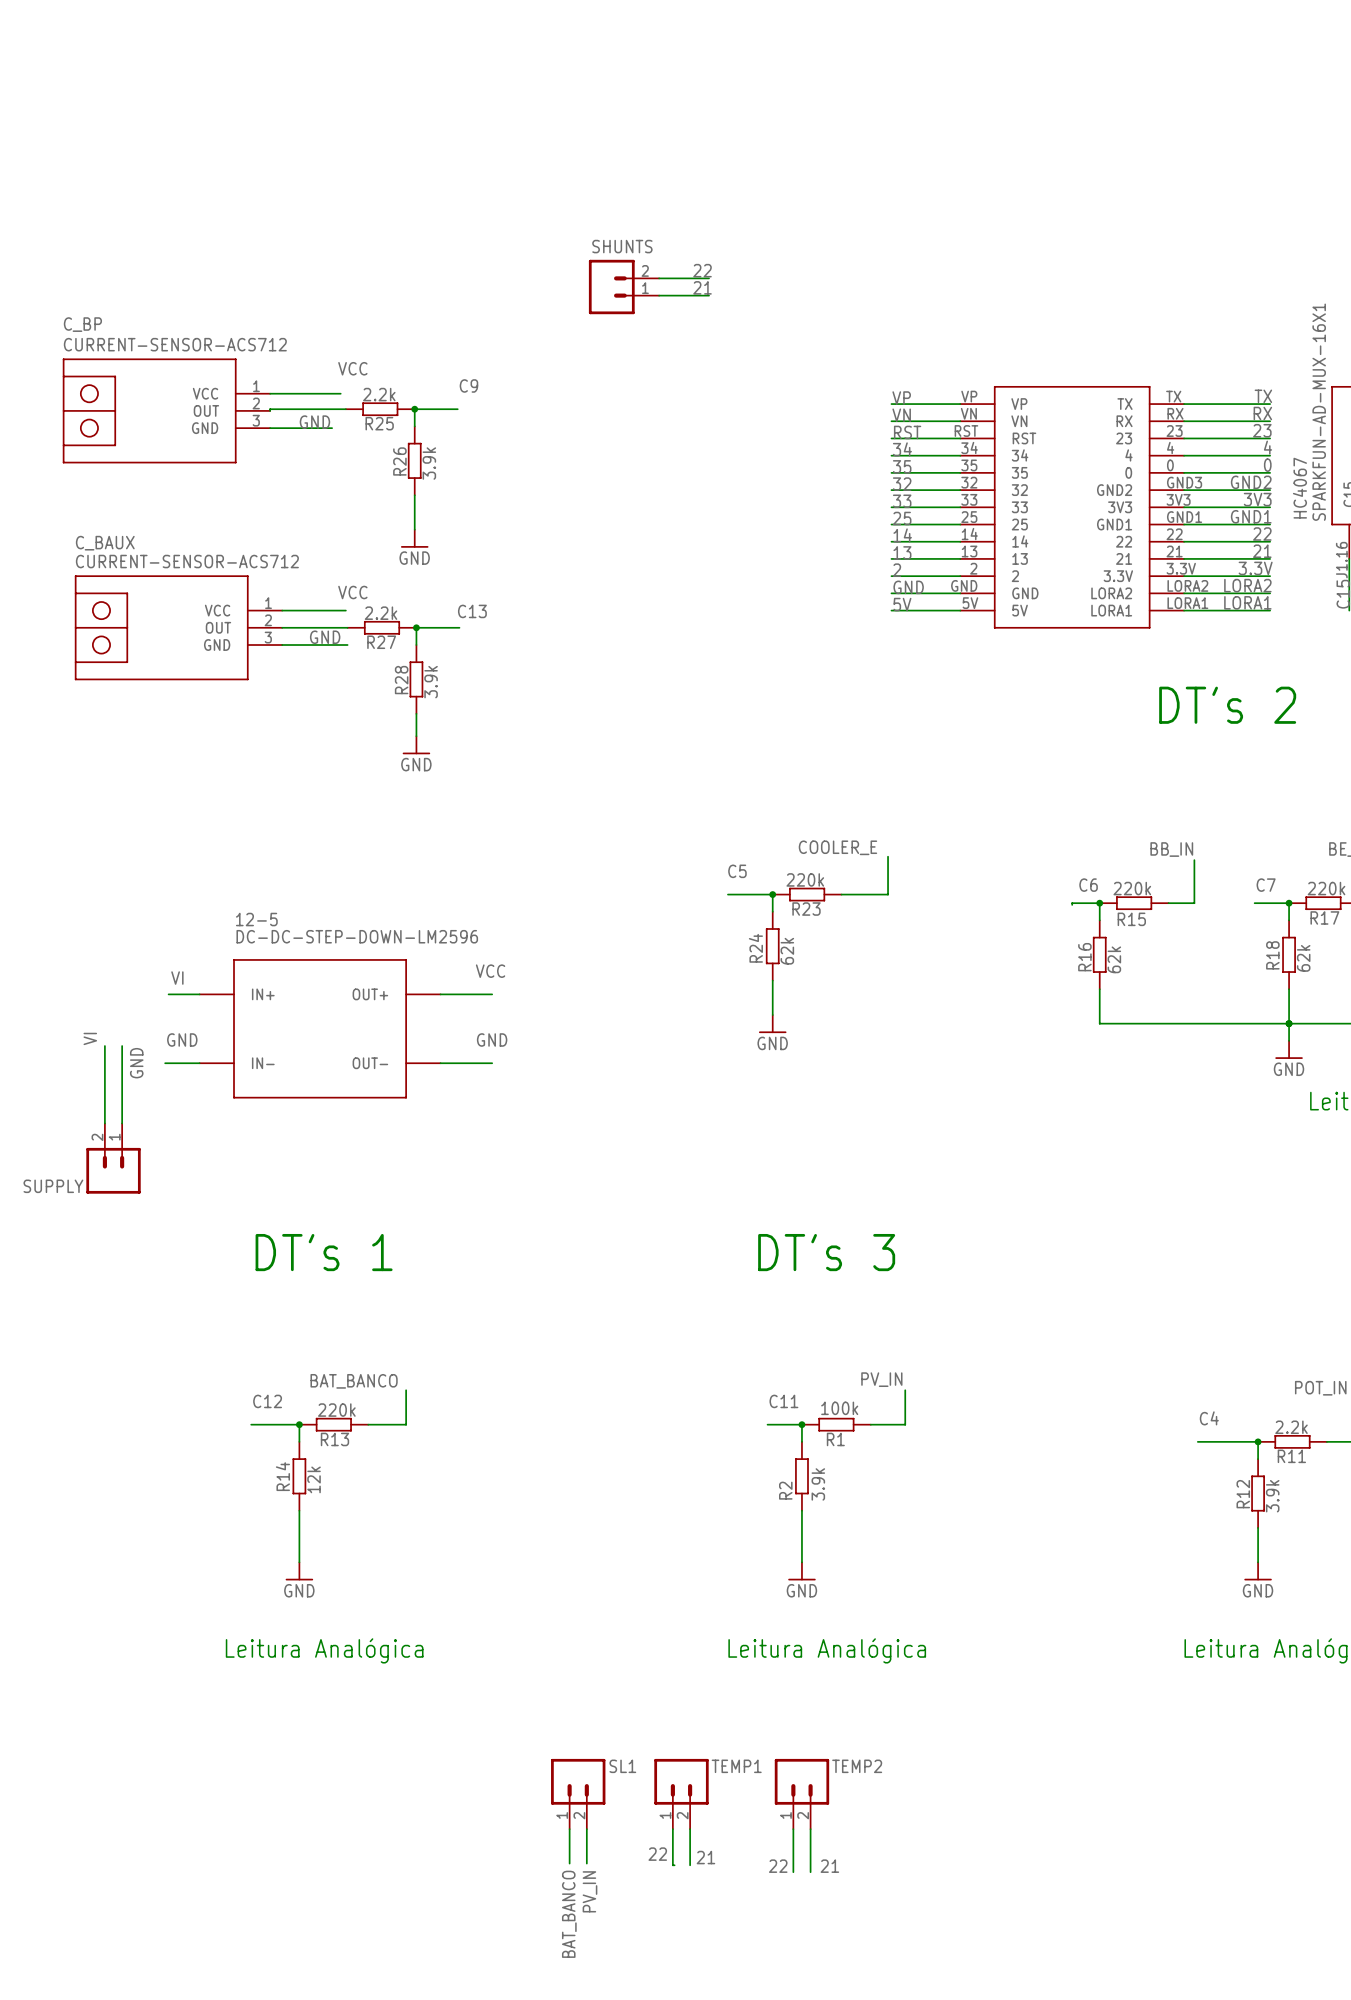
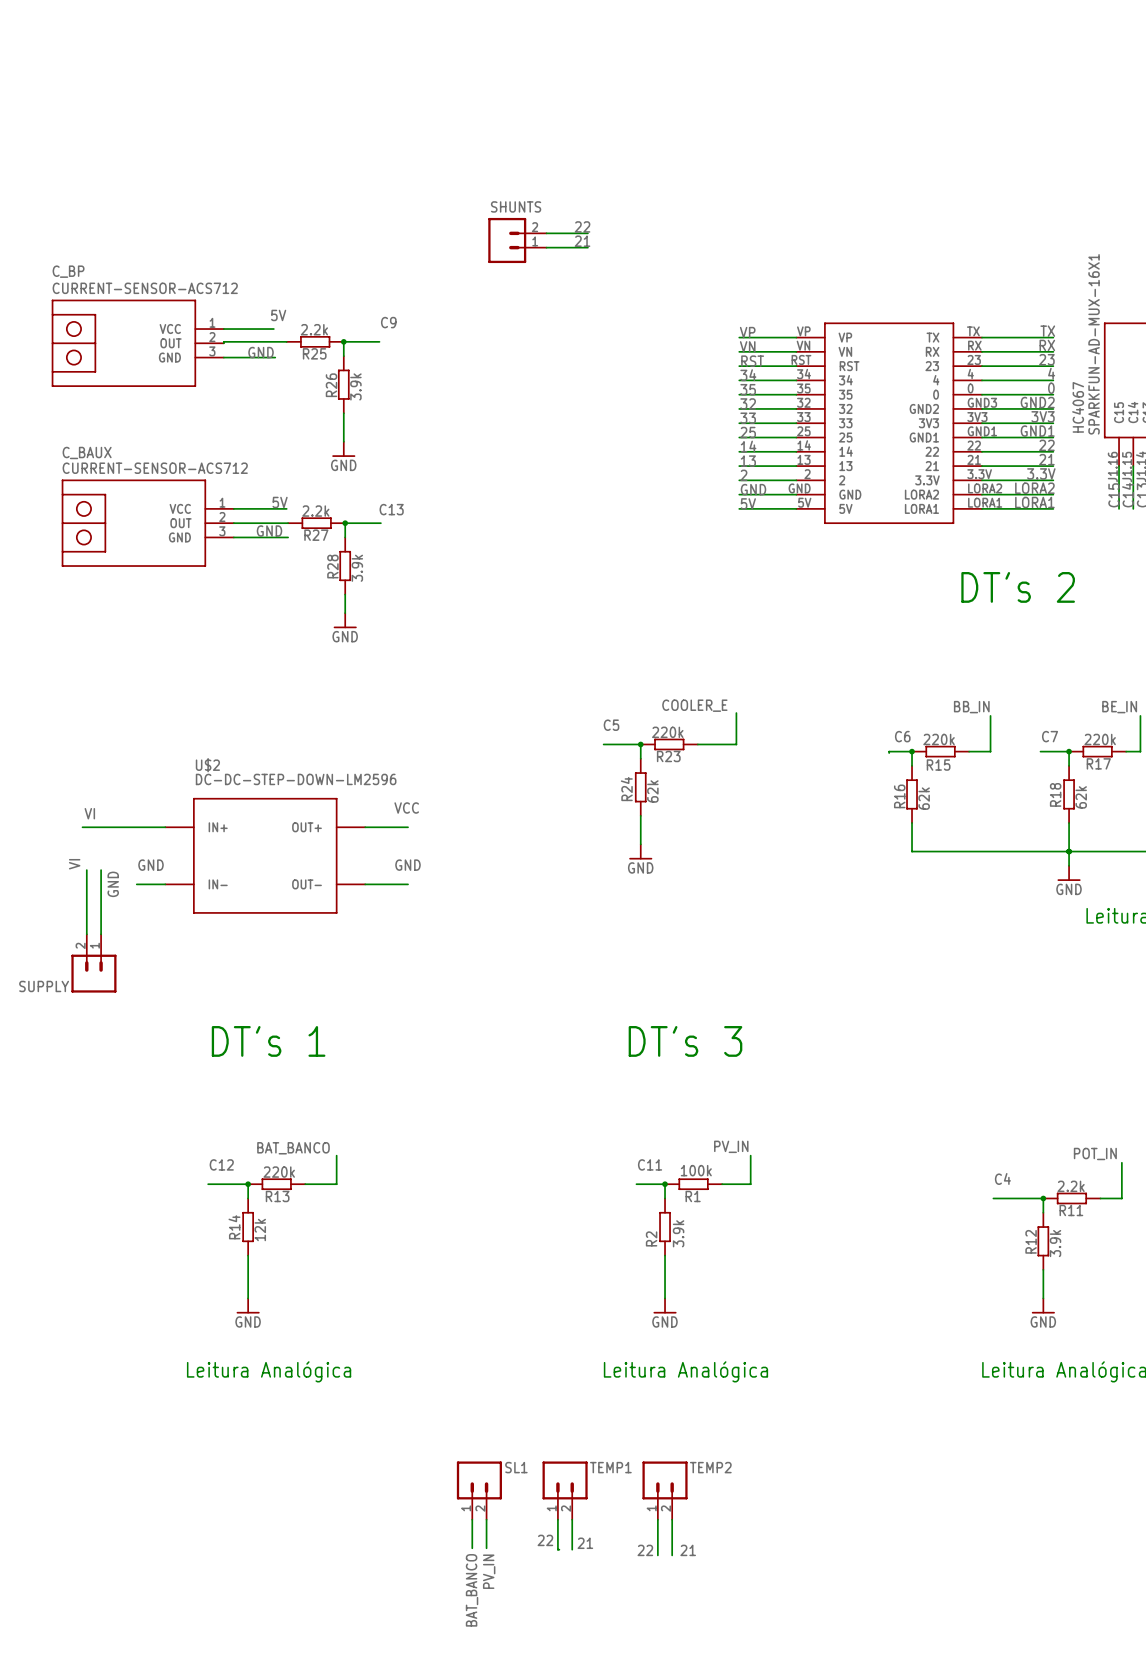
label: VCC (352, 368) -> none
label: none -> 5V (278, 315)
wire: (330, 393) (340, 393) -> none
label: VCC (352, 592) -> none
label: none -> 5V (280, 502)
12-5 name: 12-5 (256, 919) -> U$2 (207, 765)
label position: VI (177, 978) -> VI (89, 813)
wire: none -> (82, 827) (139, 827)

